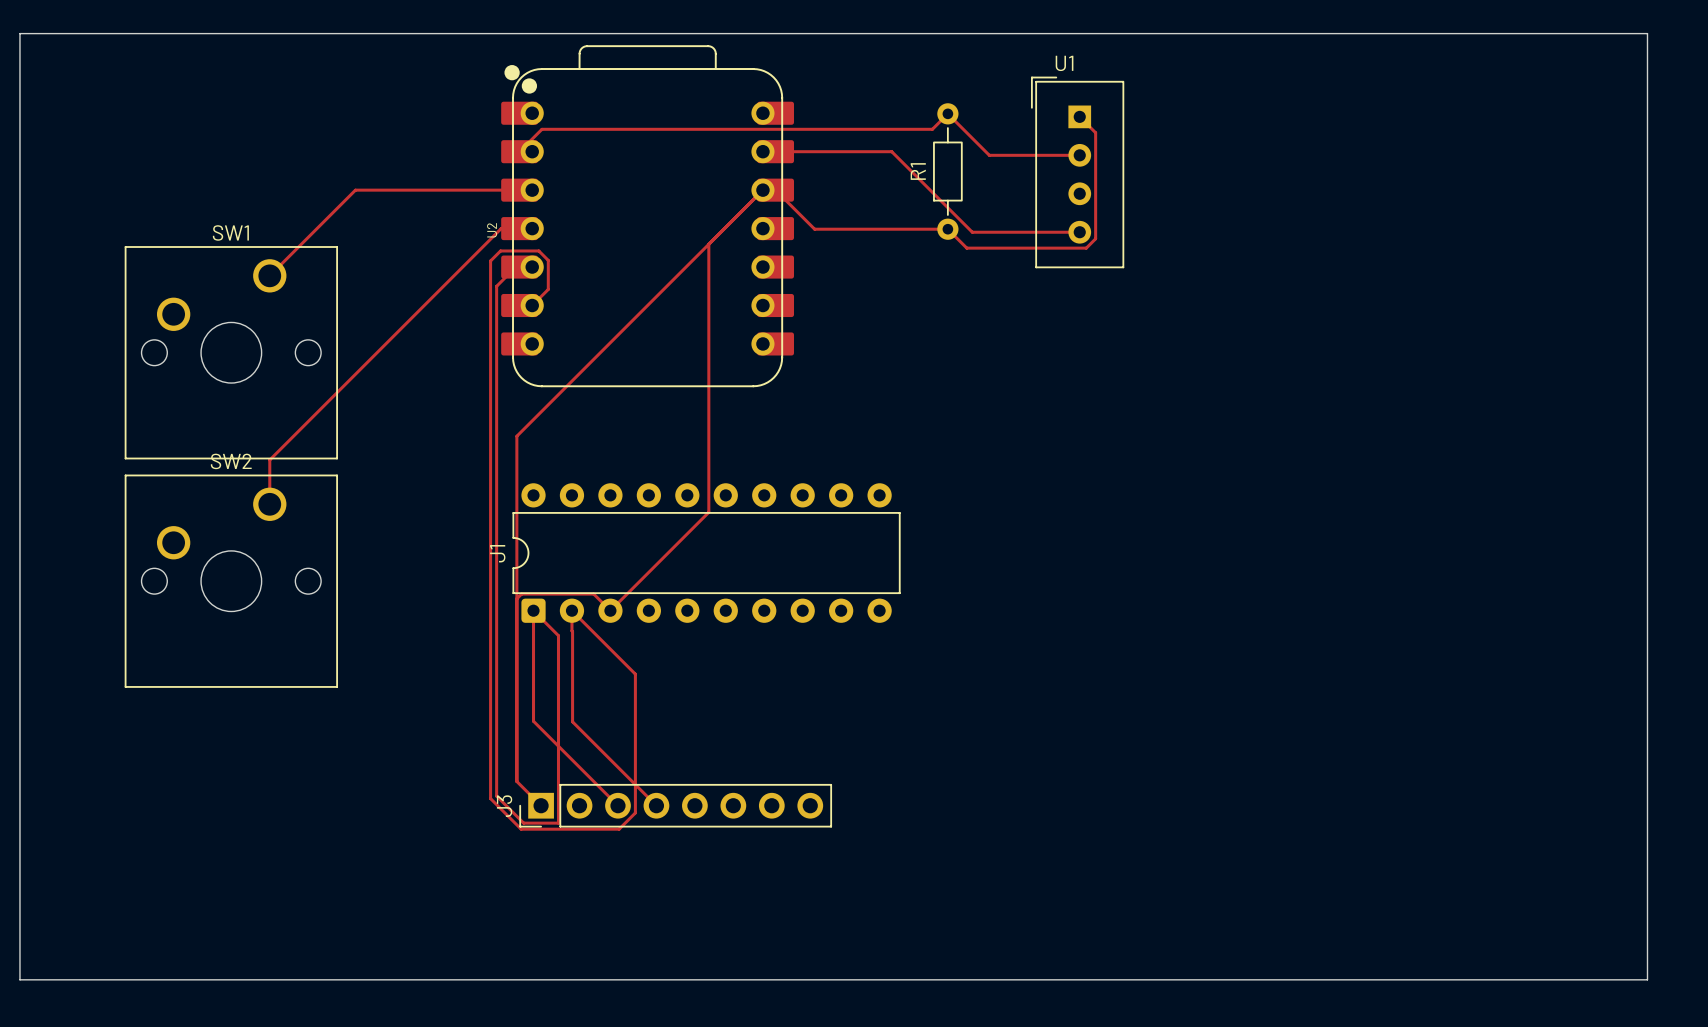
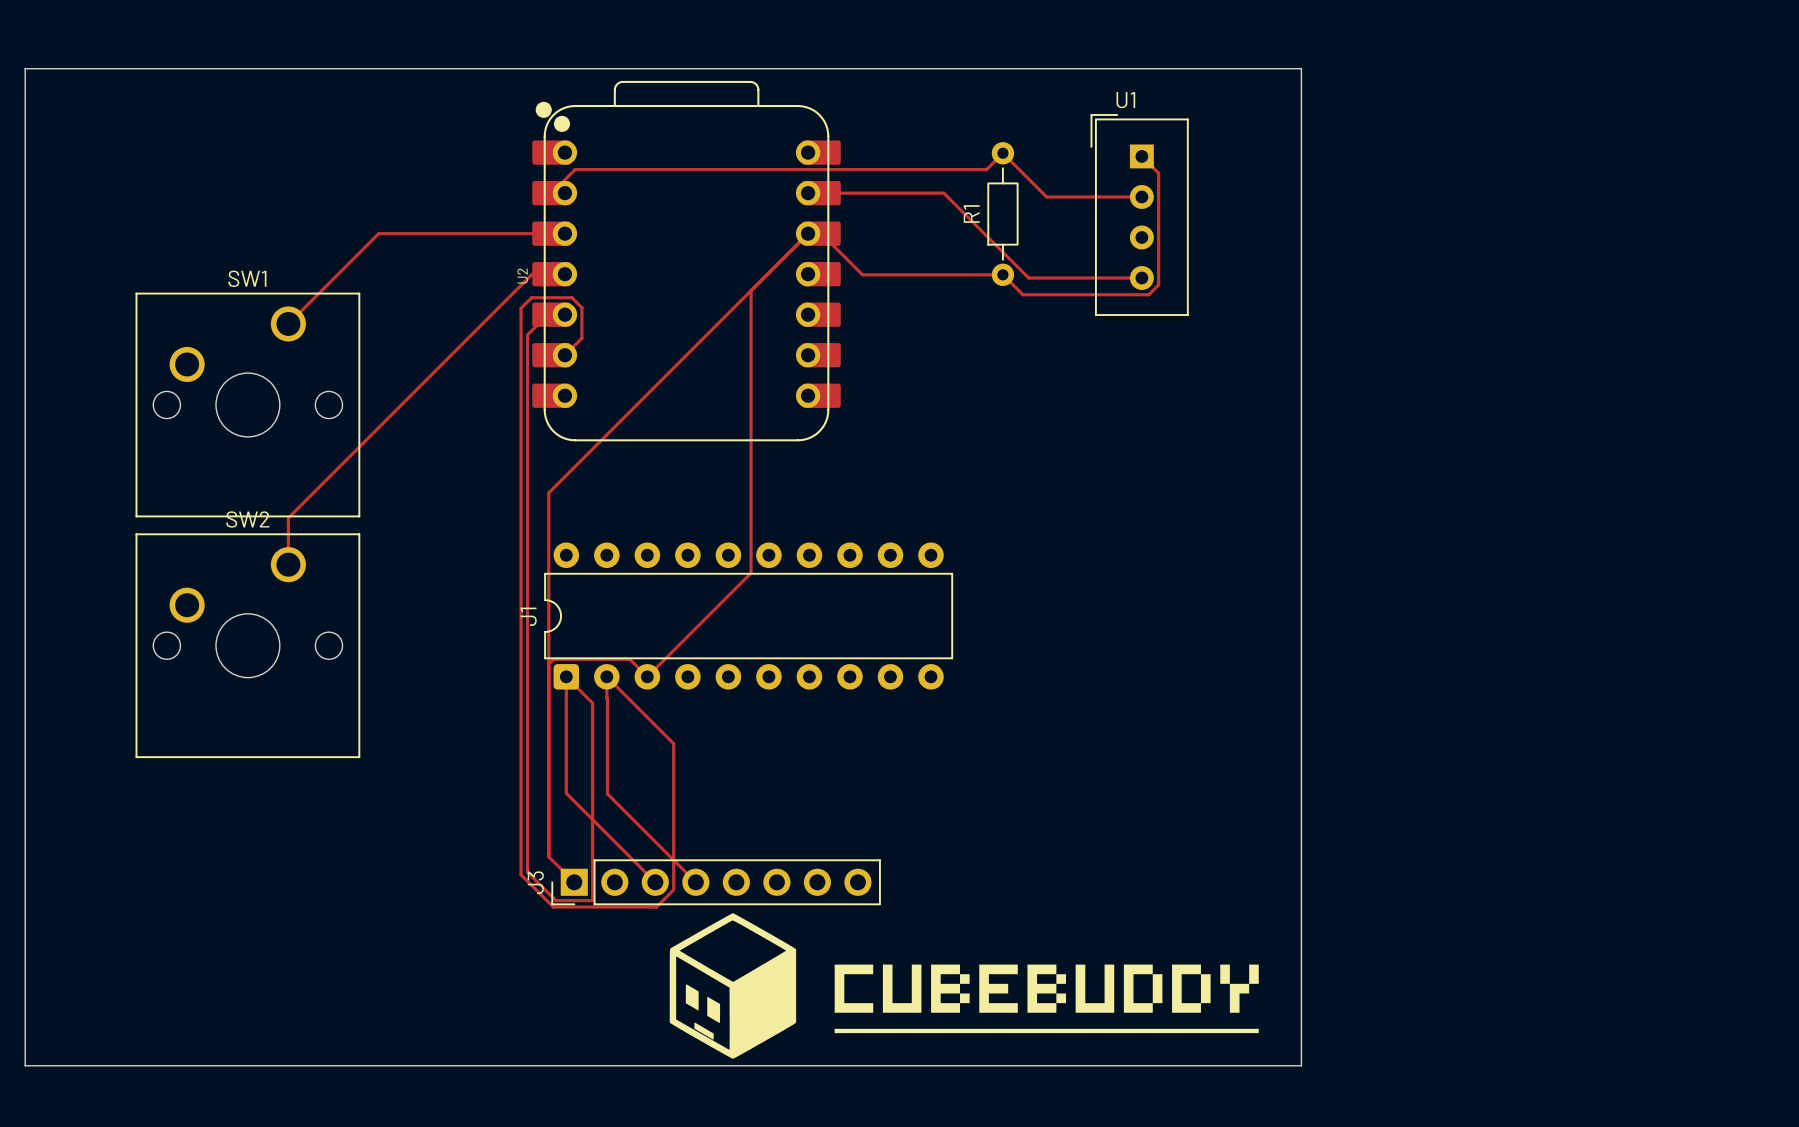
board edge: (1231, 33) (1647, 33) (1647, 979) (1231, 979) -> (1301, 68) (1301, 1065)
drawing: none -> [669, 913, 1259, 1059]

